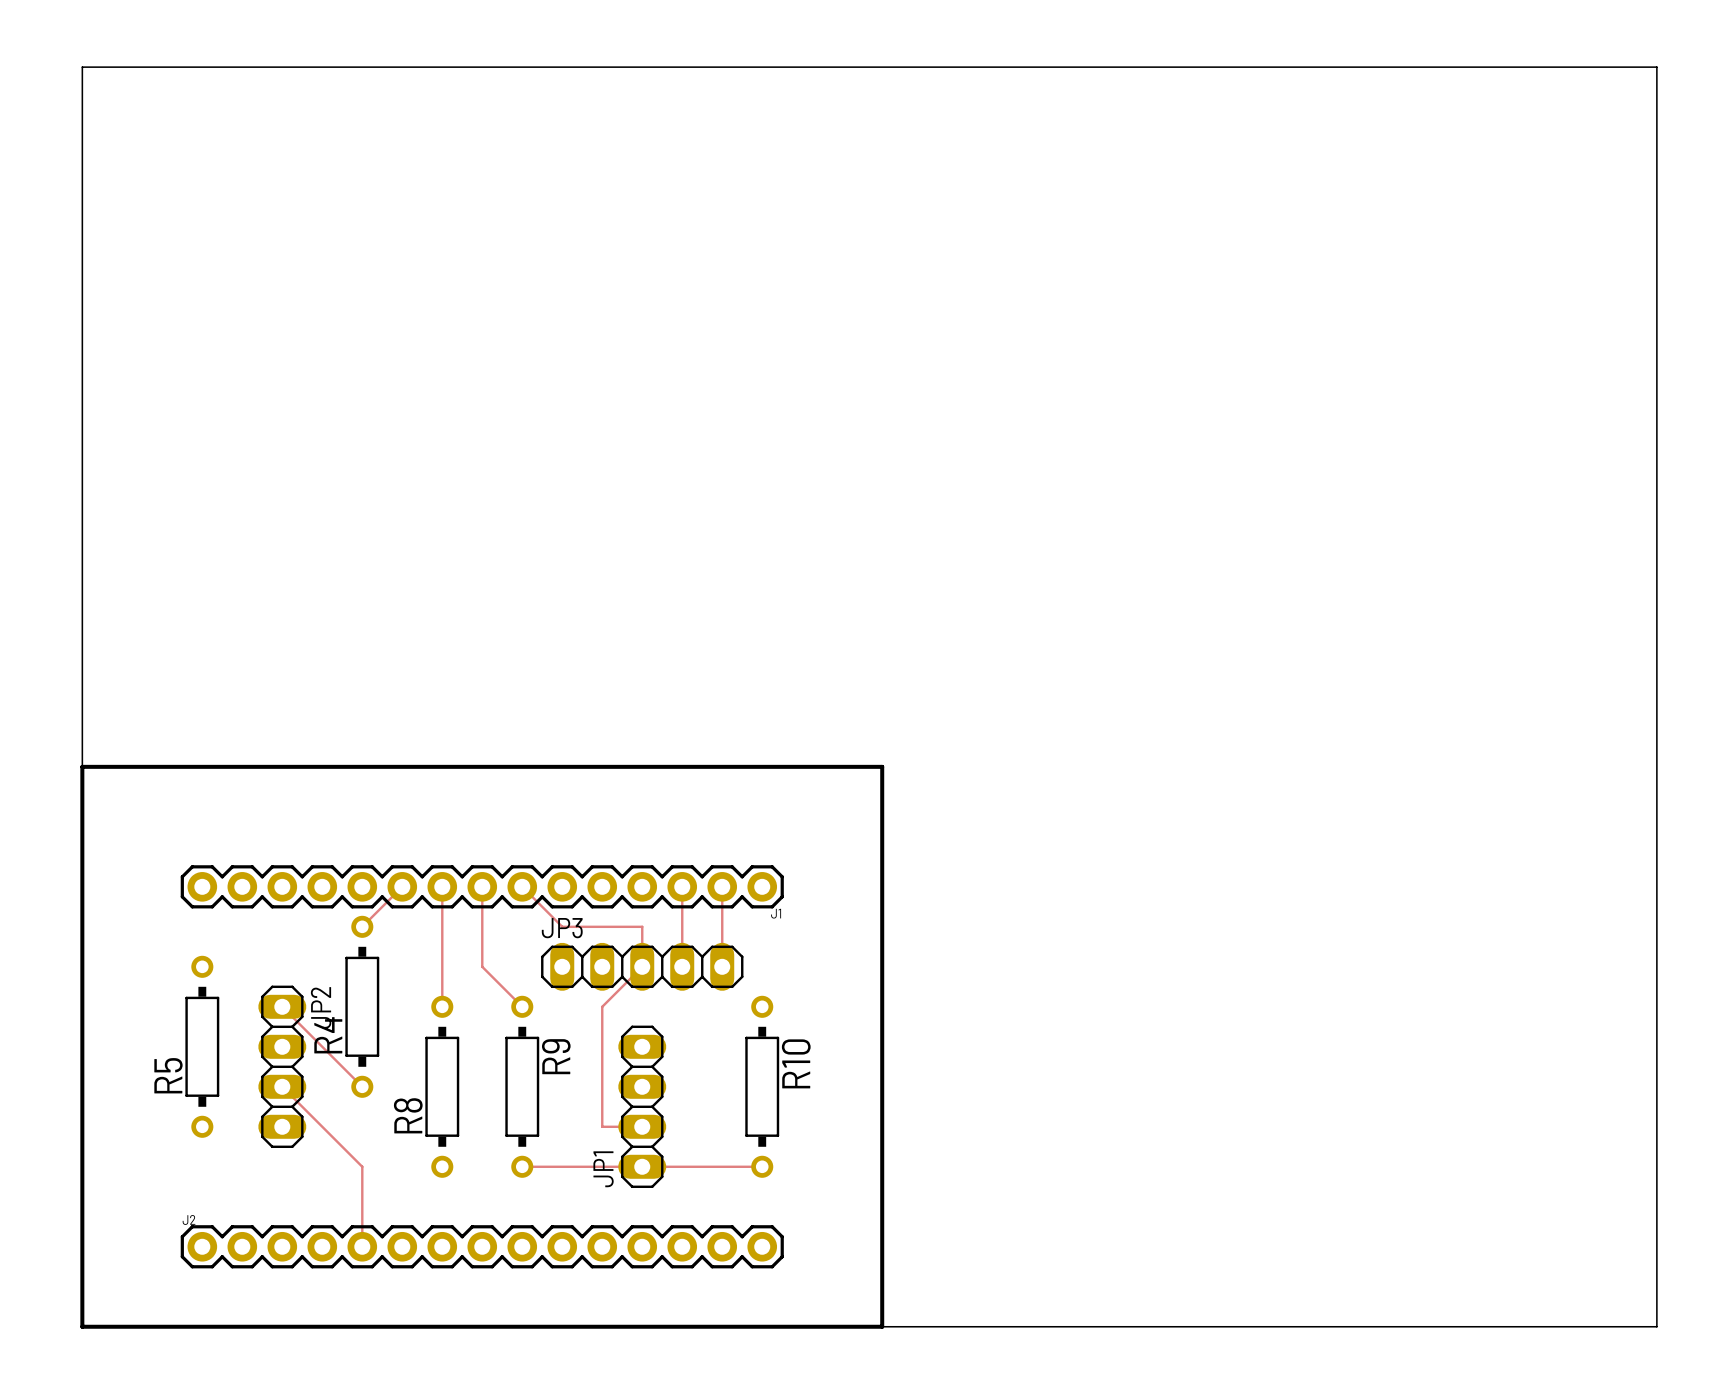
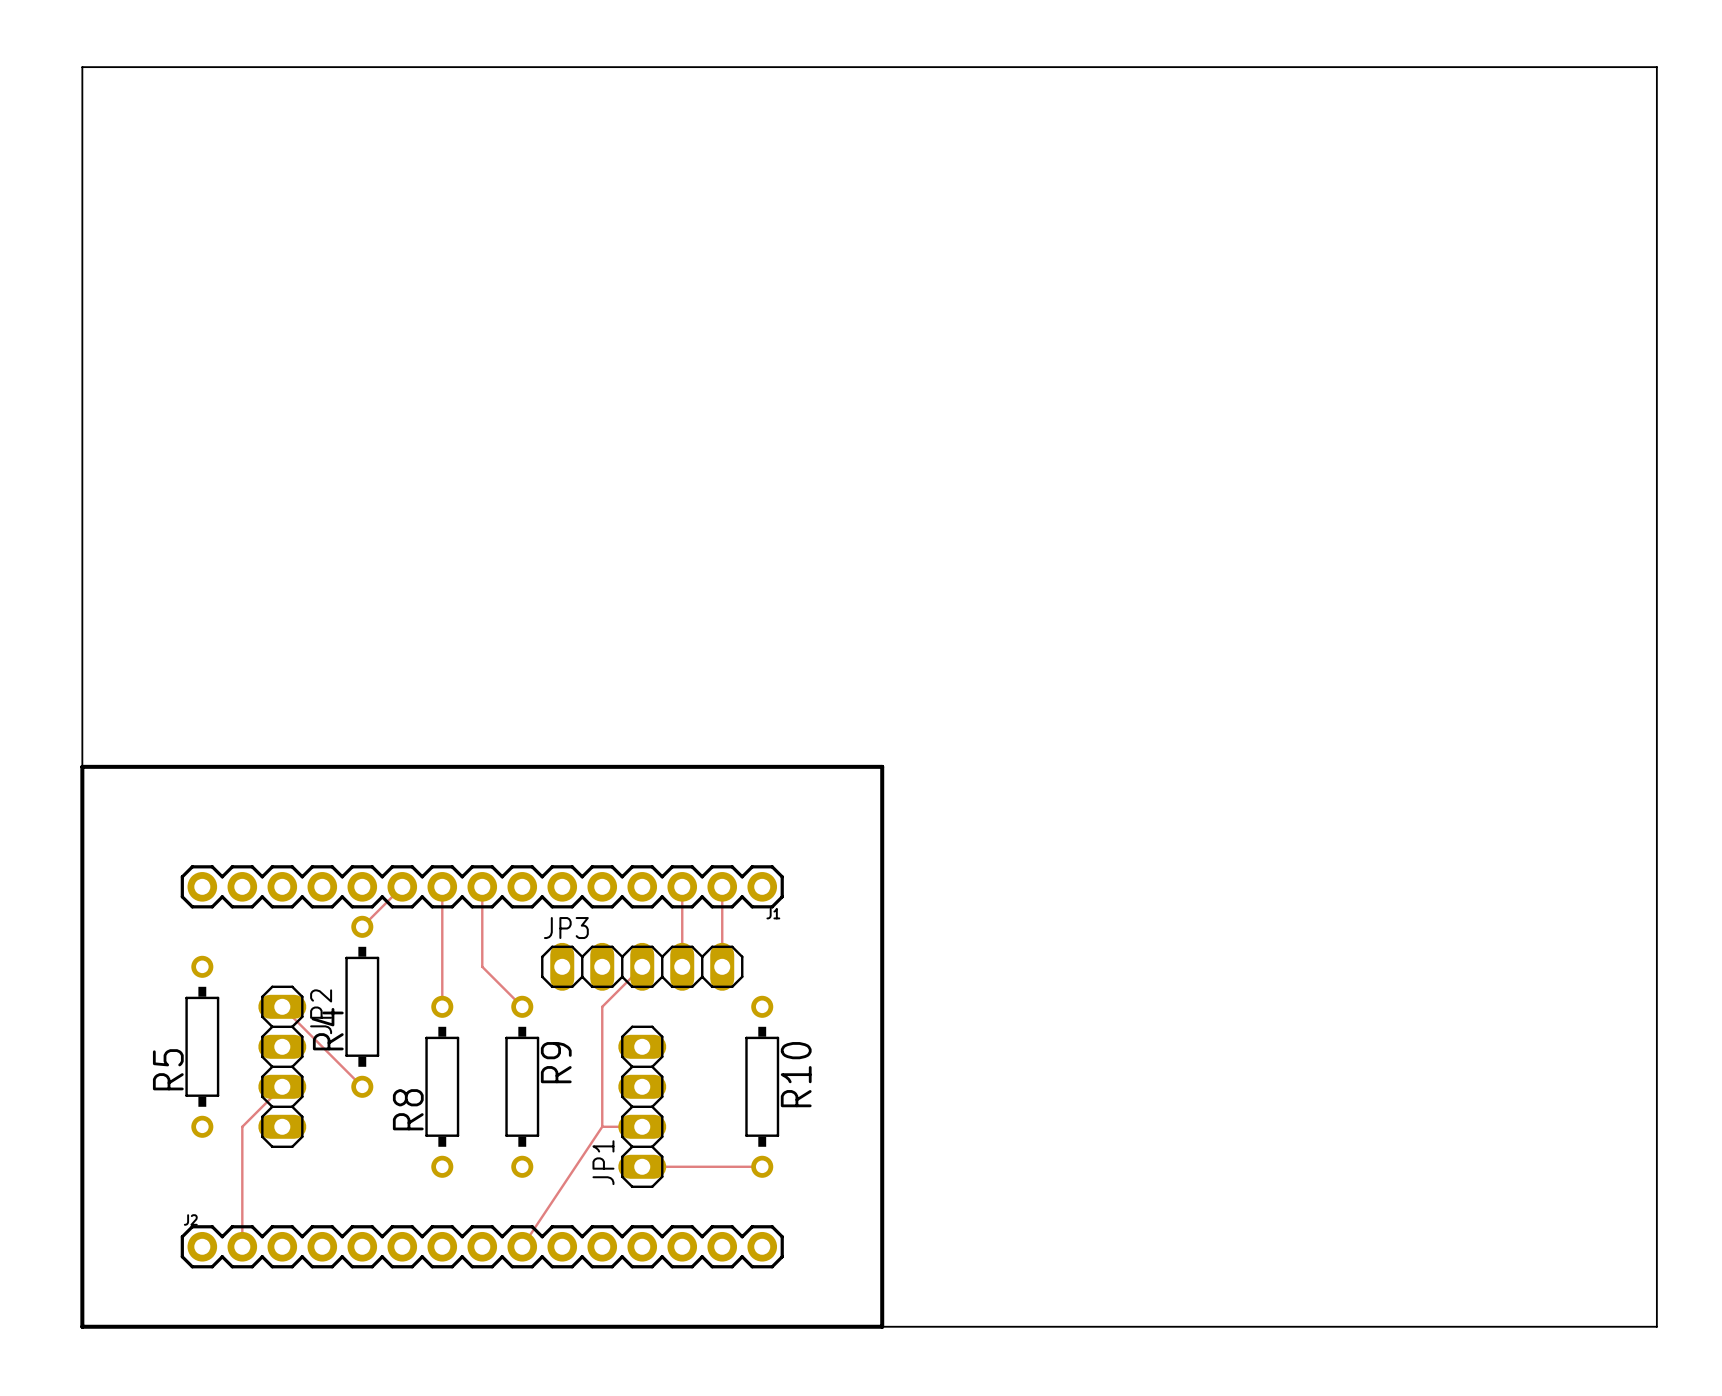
track: (522, 886) (562, 926) (642, 926) (642, 966) -> none
track: (282, 1086) (362, 1166) (362, 1246) -> (282, 1086) (242, 1126) (242, 1246)
track: none -> (602, 1126) (522, 1246)
track: (522, 1166) (642, 1166) -> none

